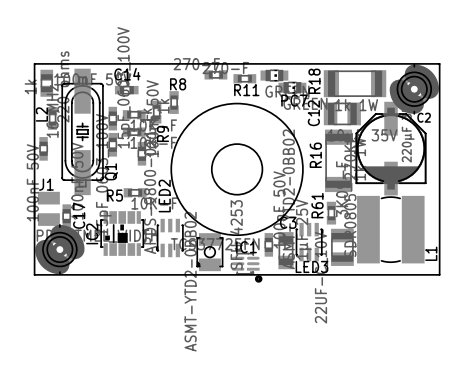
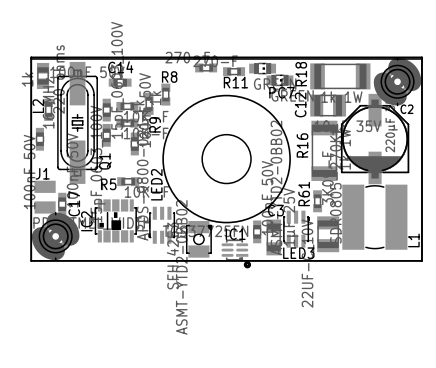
line: none -> (31, 58) (421, 58) (421, 260) (31, 260) (31, 58)
part rotation: 0° (209, 252) -> 180° (198, 239)

